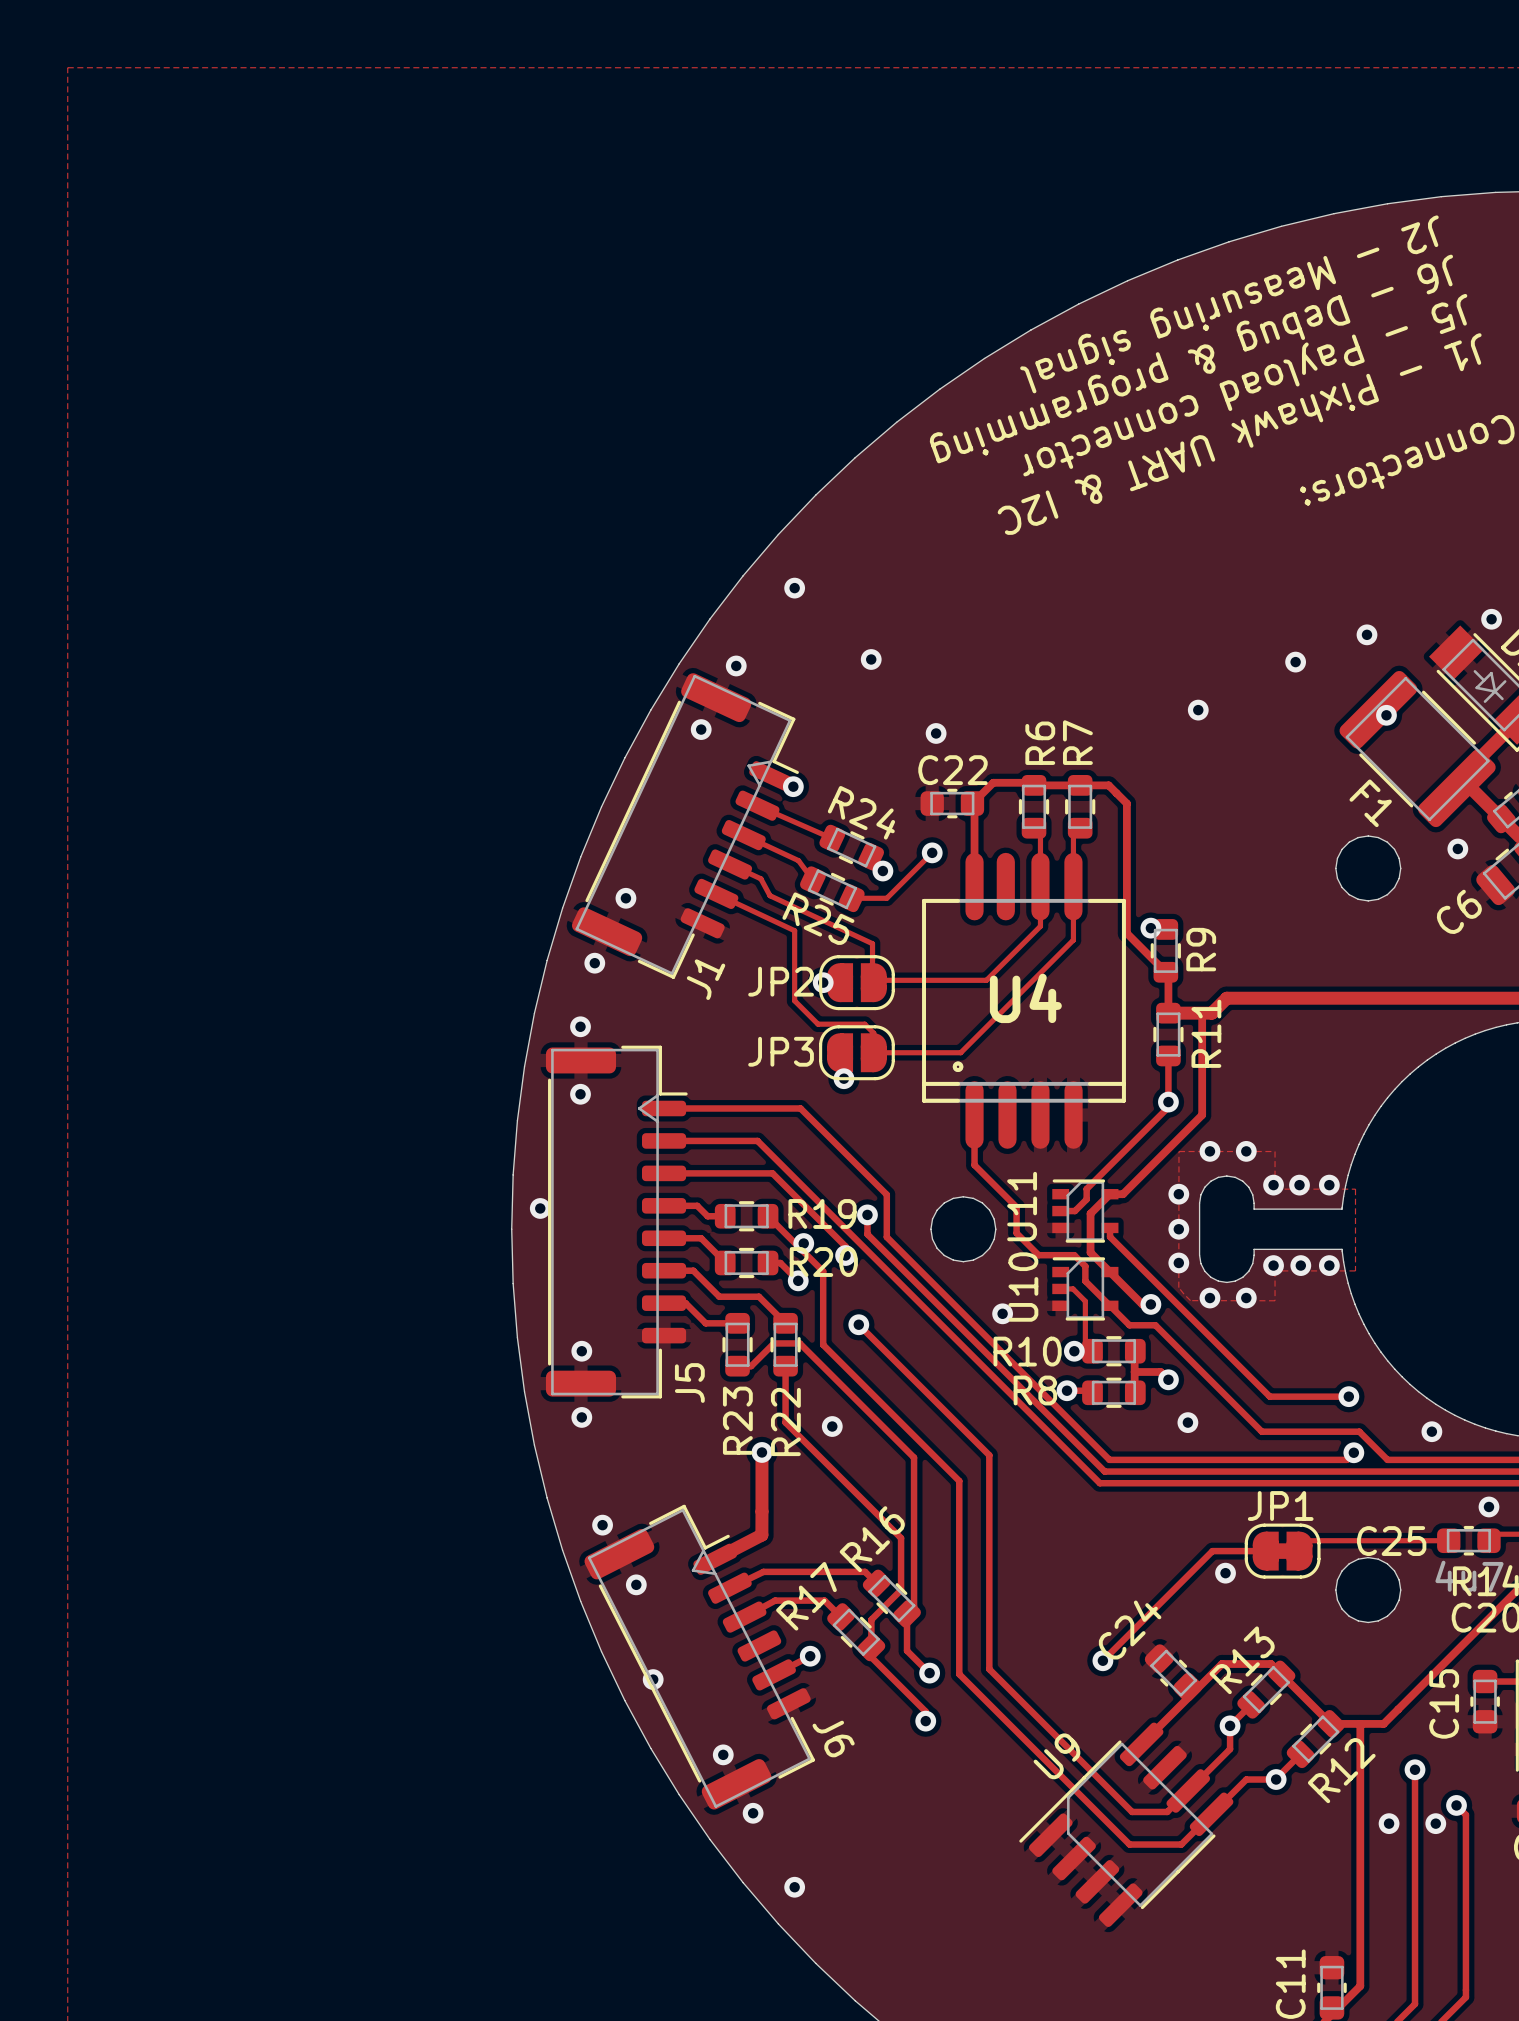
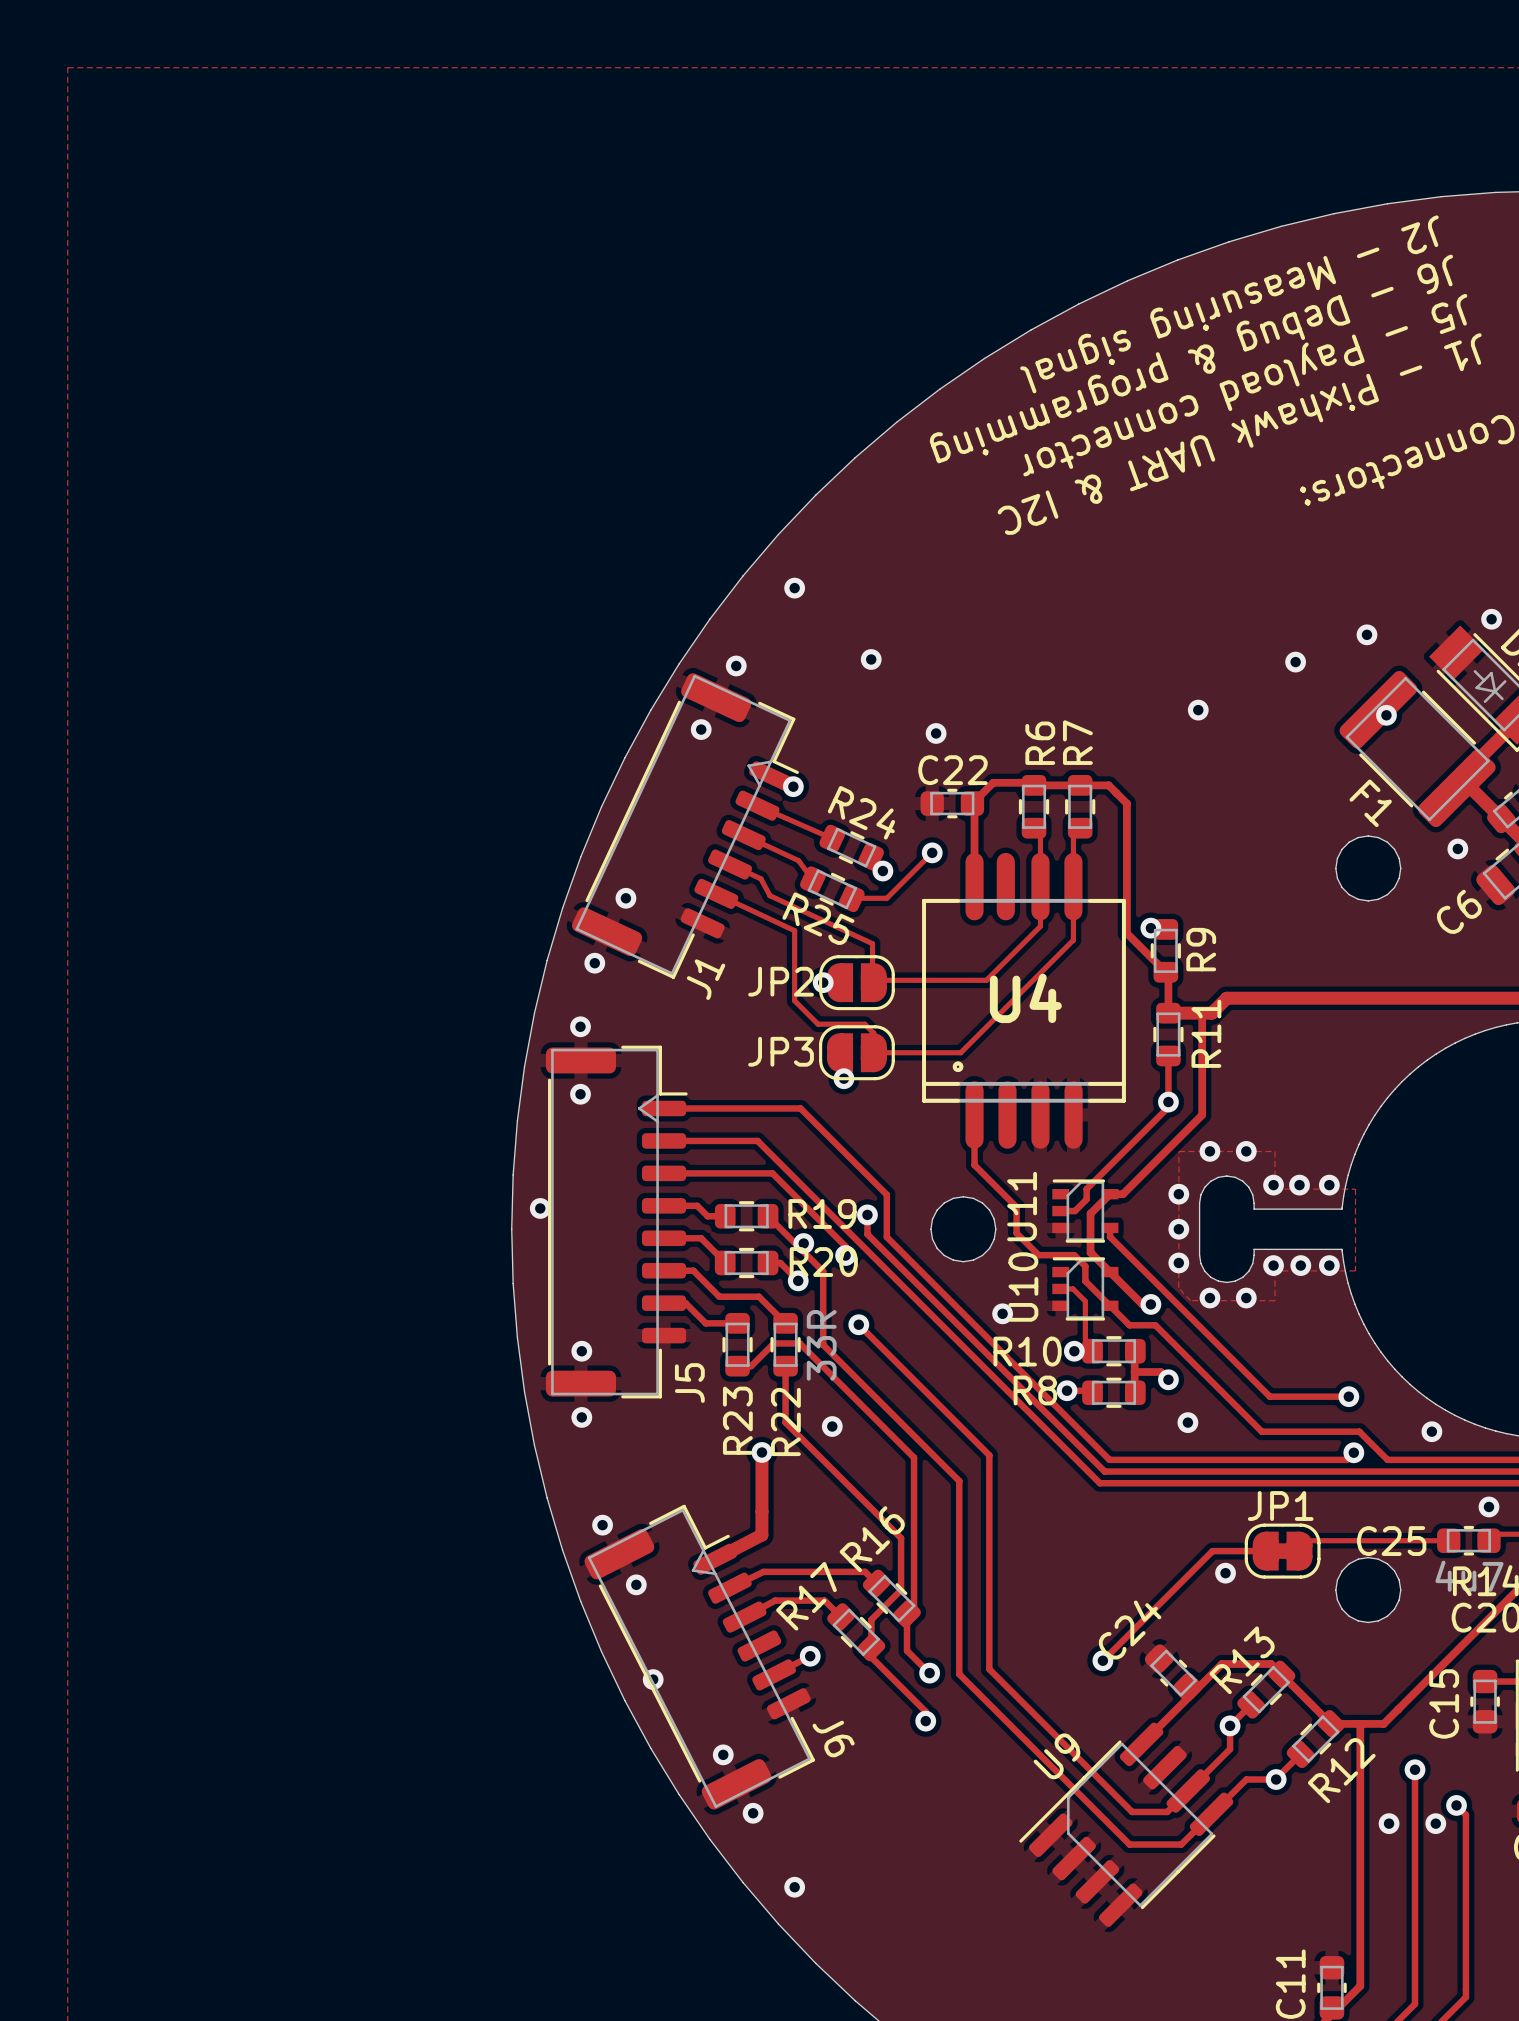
R22 value: none -> 33R (821, 1345)

